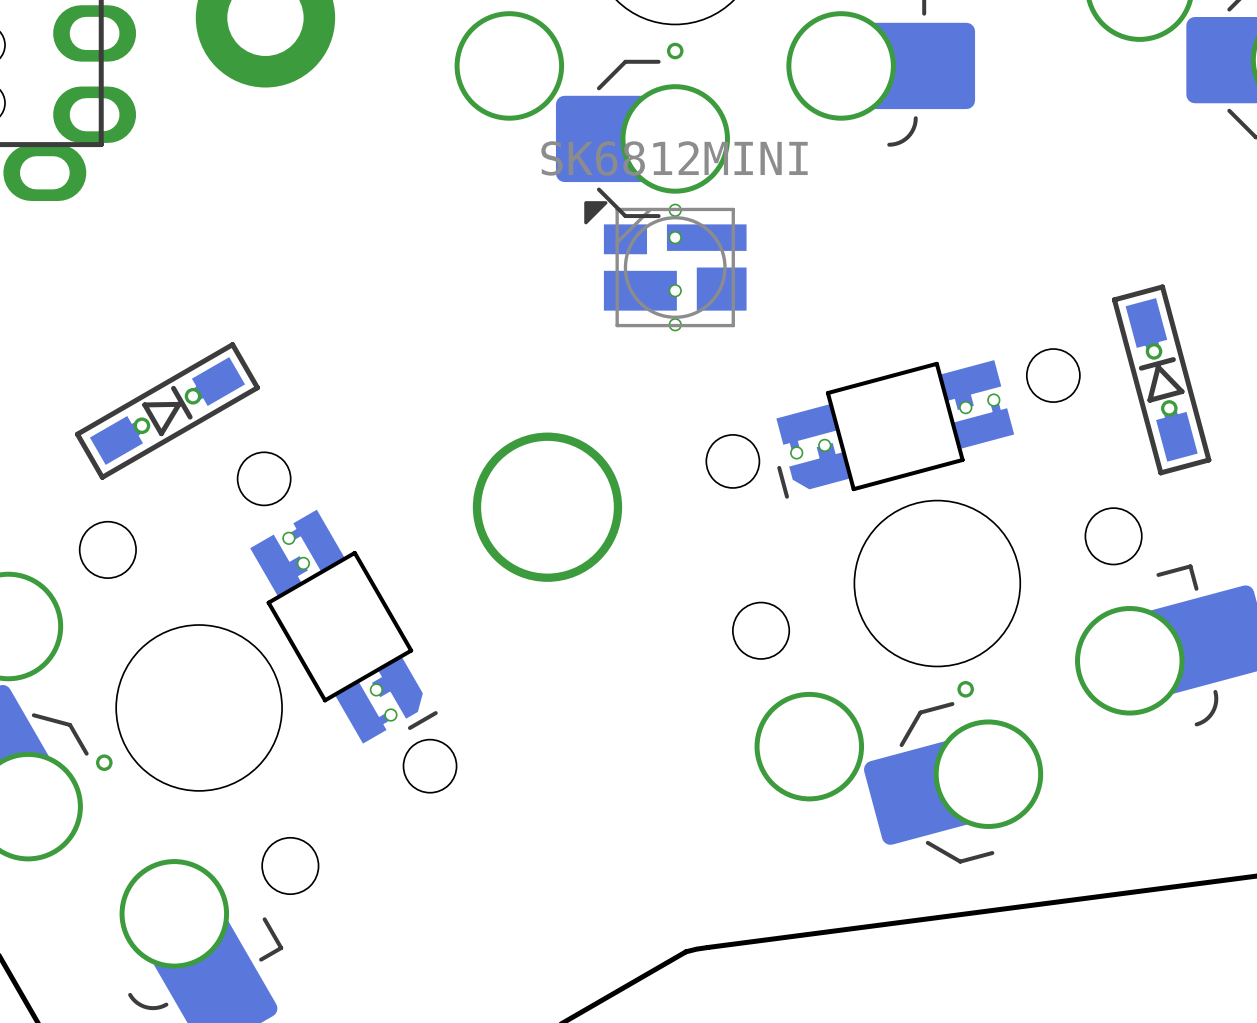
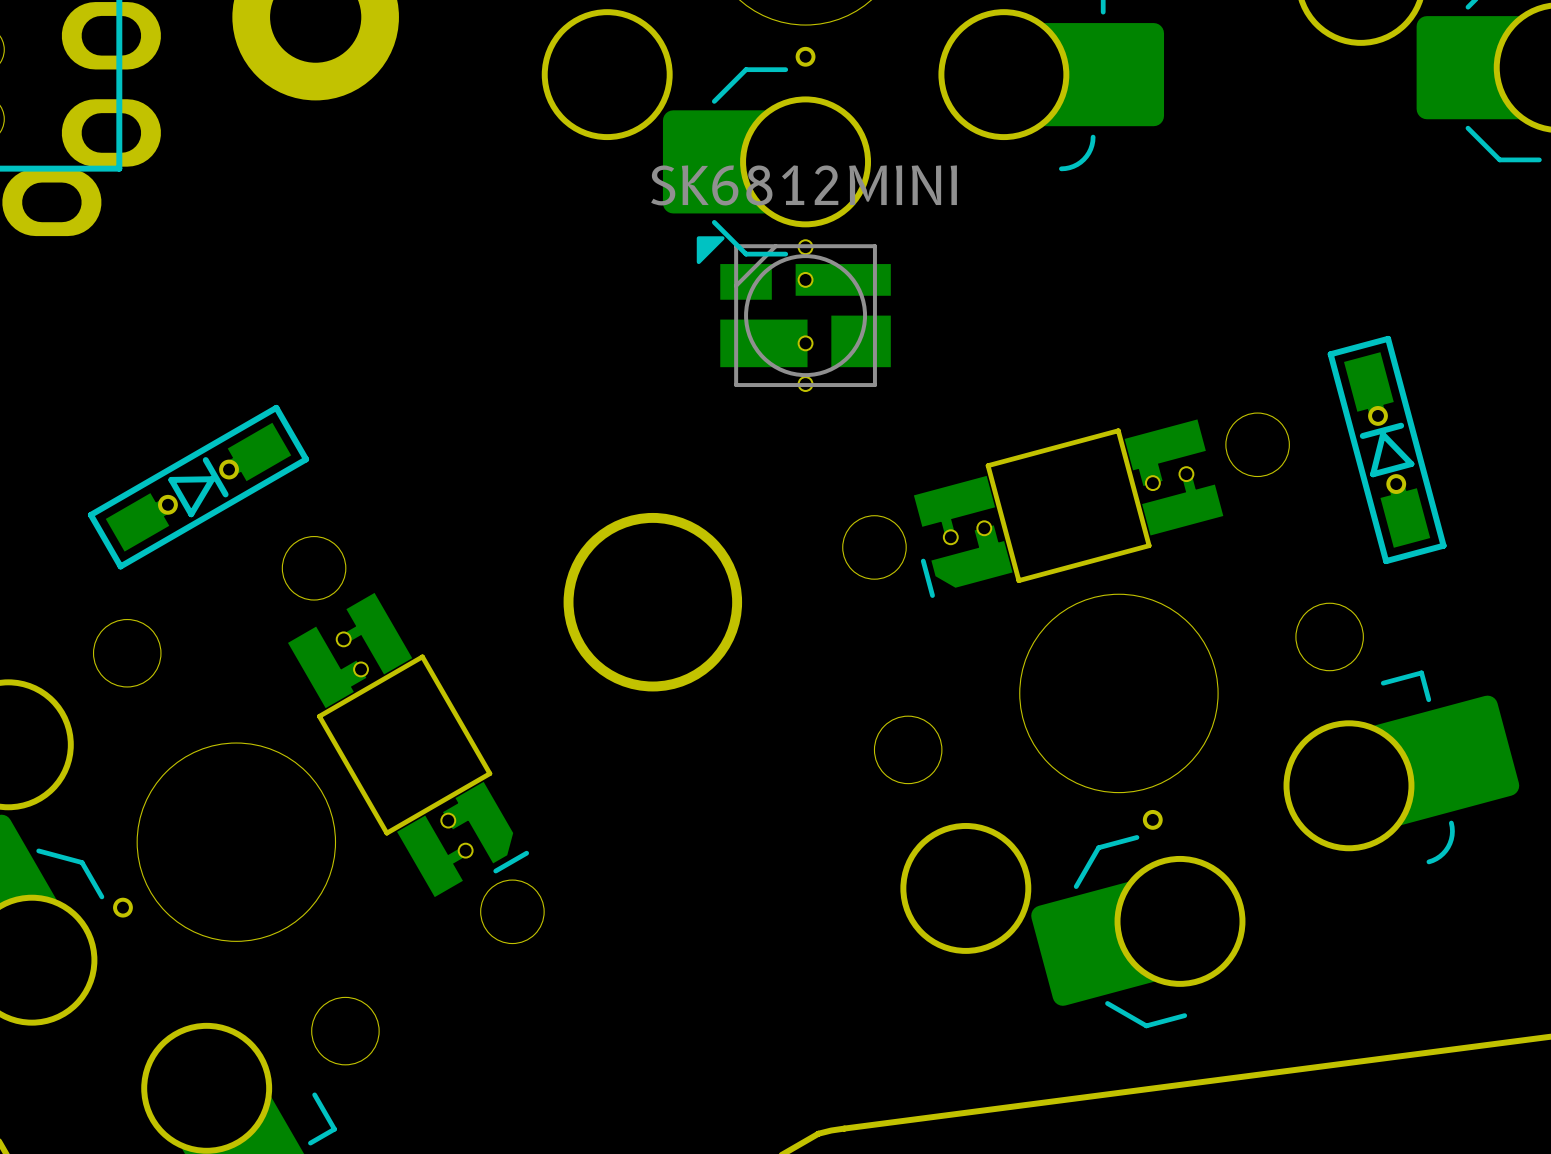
part footprint: [776, 360, 1015, 499] -> [913, 419, 1224, 598]
part footprint: [250, 509, 438, 744] -> [287, 592, 530, 898]

